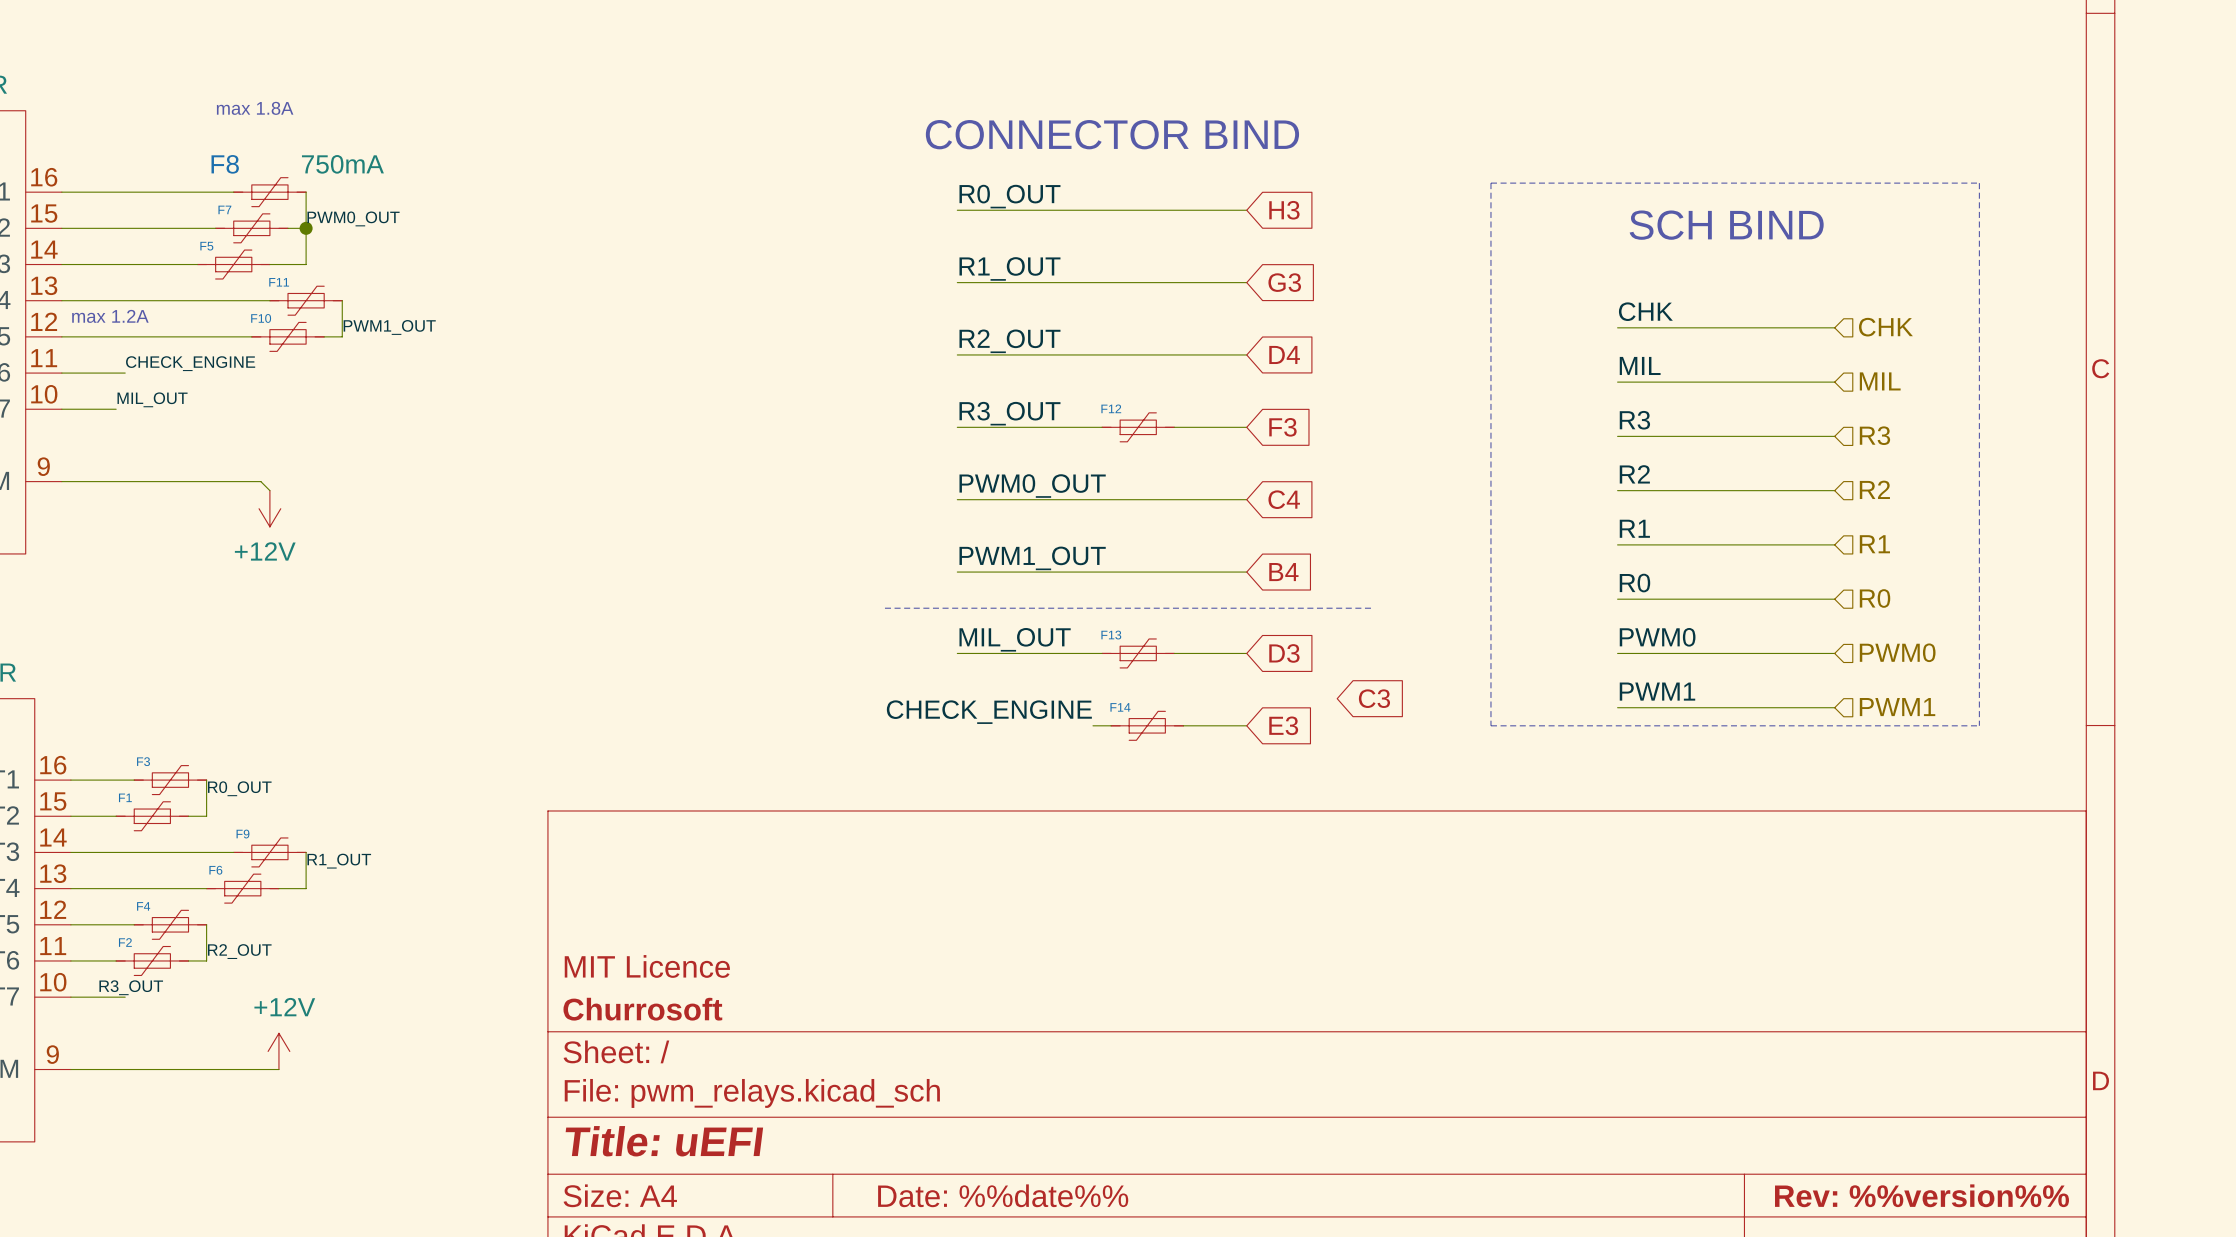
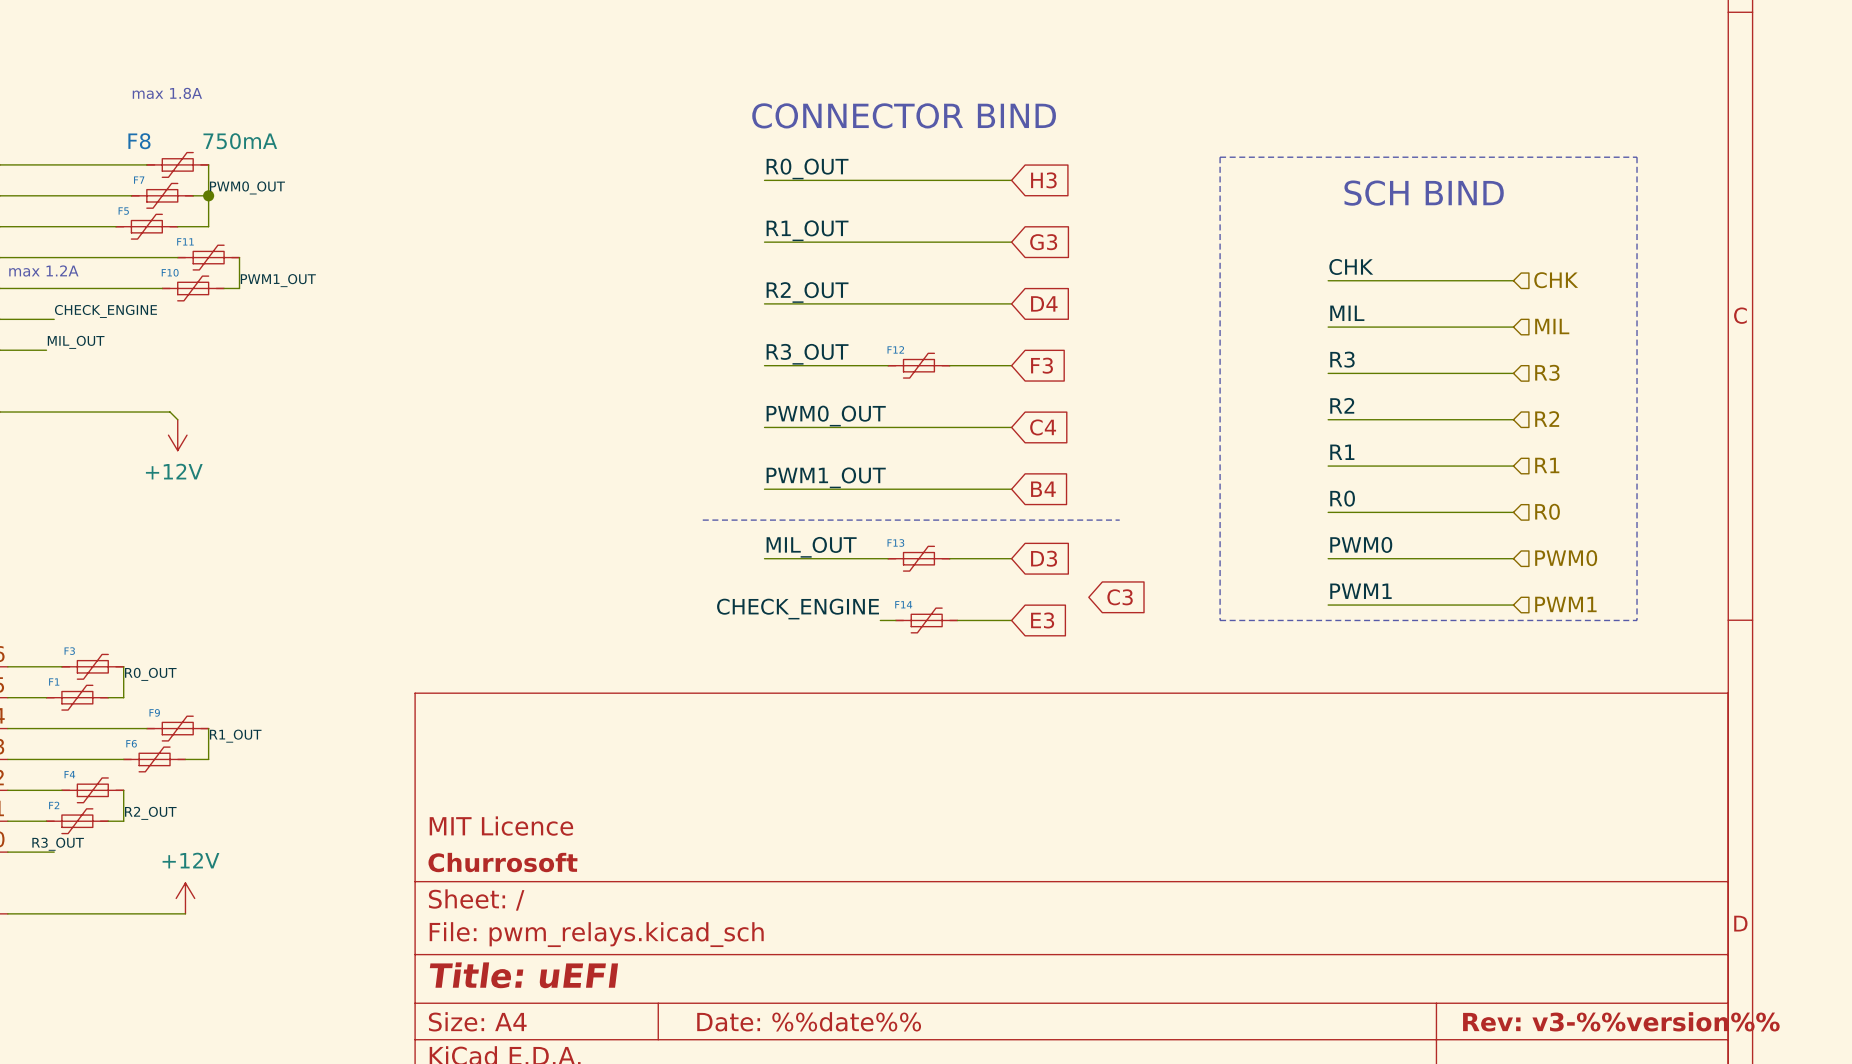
title block: Rev: %%version%% (1922, 1195) -> Rev: v3-%%version%% (1621, 1021)

